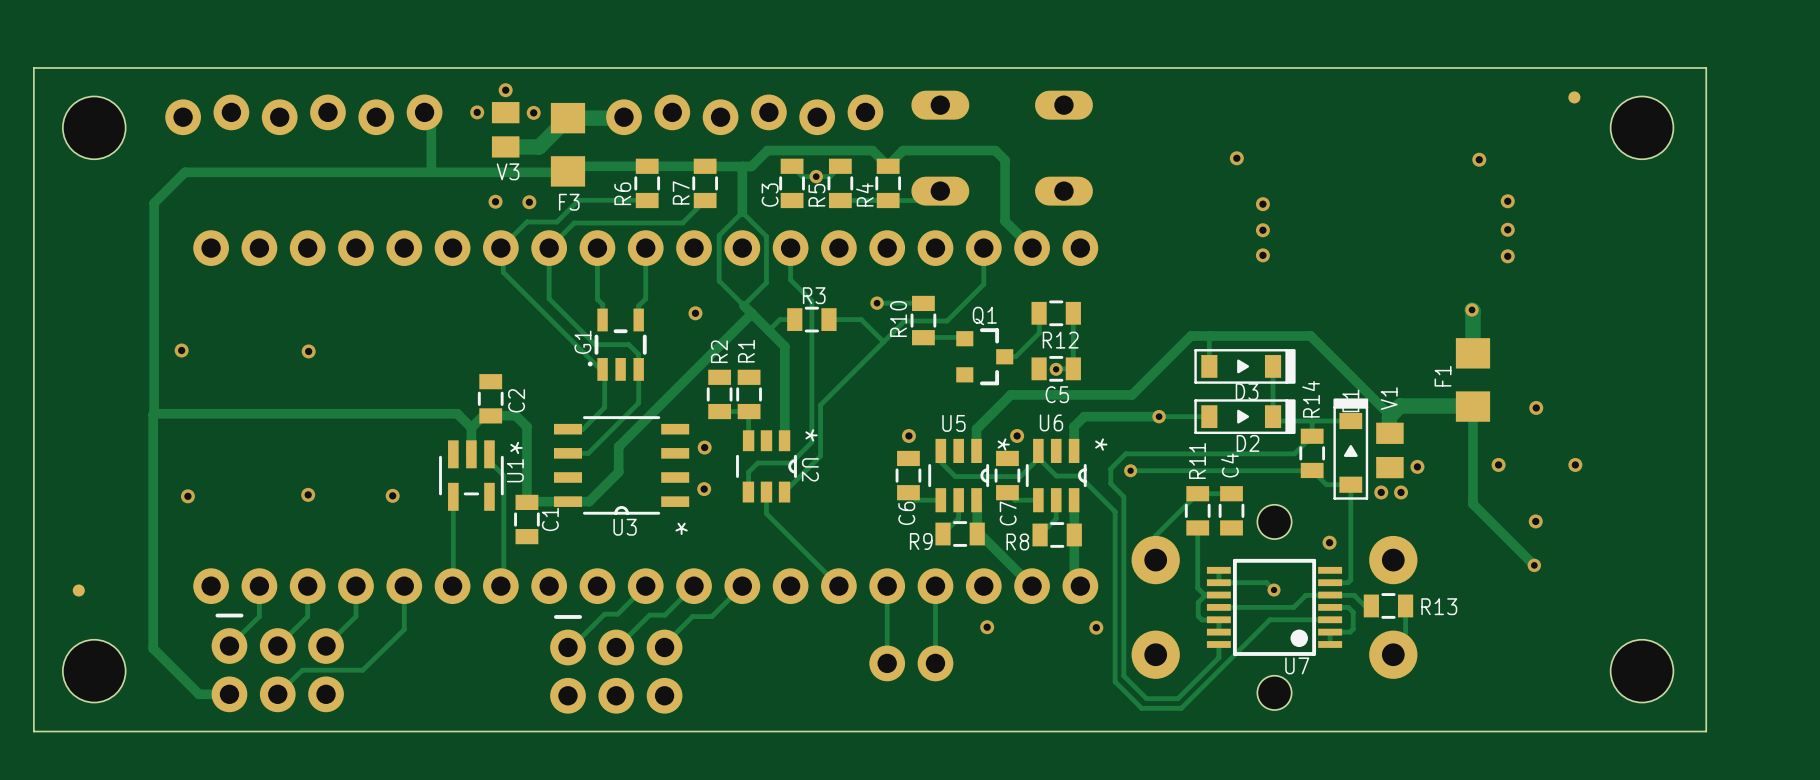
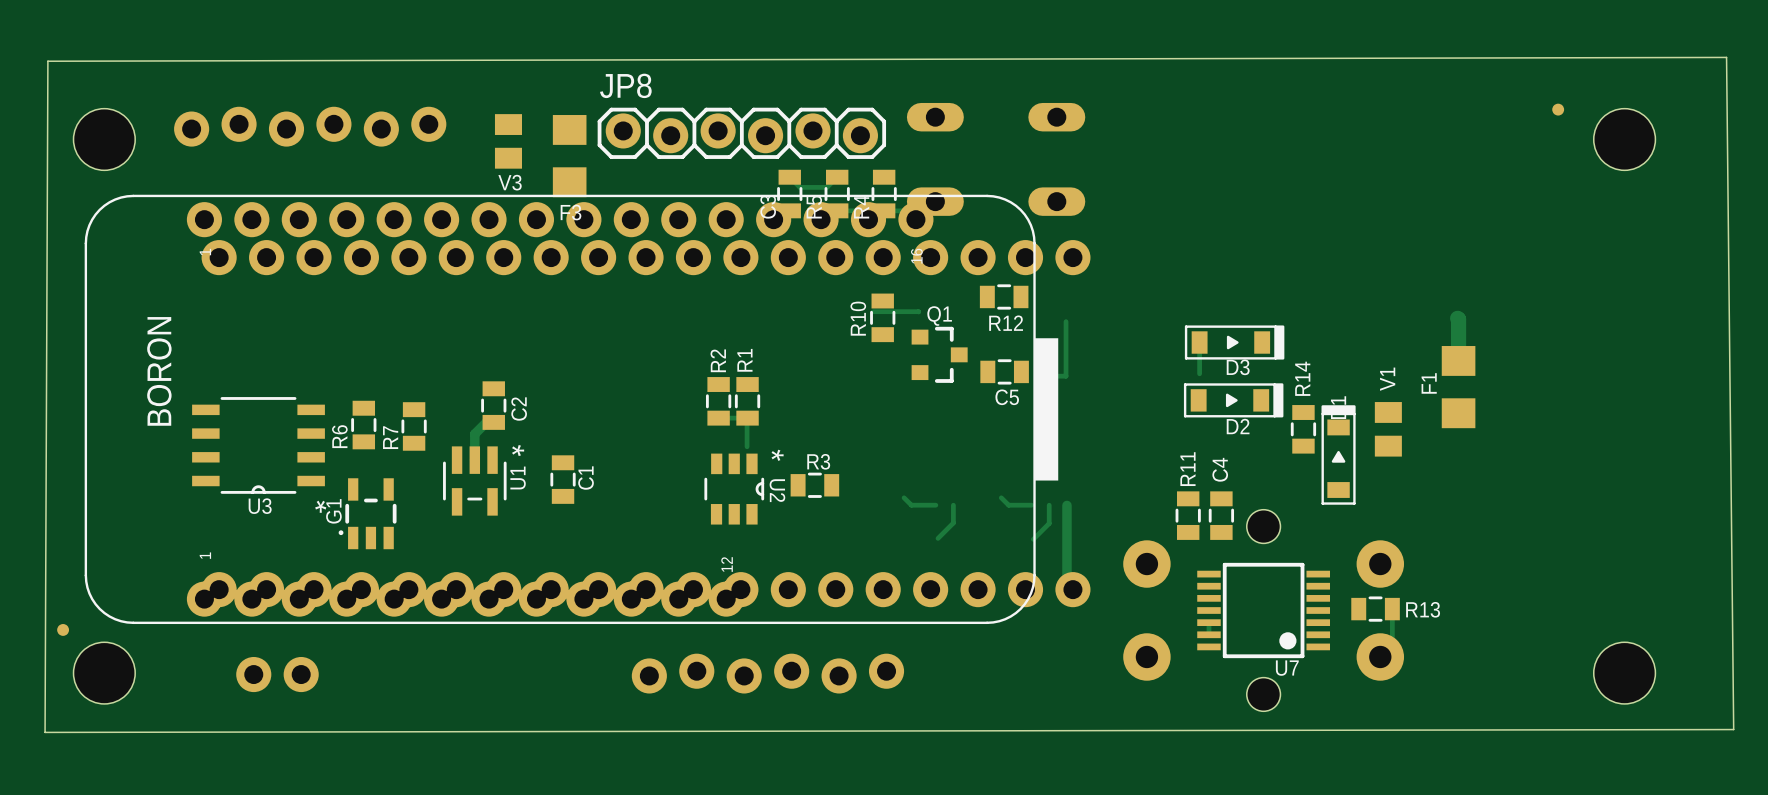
board edge: (33, 67) (1706, 67) (1706, 731) (33, 731) (33, 67) -> (1726, 57) (47, 61) (45, 732) (1733, 729) (1726, 57)
via: (505, 90) -> none
track: (424, 112) (431, 119) (431, 172) -> none
via: (477, 112) -> none
via: (533, 112) -> none
part: (744, 114) -> none
track: (624, 117) (567, 118) (539, 146) (505, 146) -> none
JP8: none -> (741, 133)
via: (1236, 158) -> none
via: (1479, 159) -> none
track: (887, 165) (903, 150) (995, 150) (1005, 160) (1005, 221) (1032, 248) -> none
track: (572, 166) (705, 166) -> none
track: (572, 166) (567, 172) (185, 172) (154, 203) (154, 413) -> none
track: (742, 166) (742, 212) -> none
track: (888, 166) (872, 150) (767, 150) (751, 166) (705, 166) -> none
via: (816, 176) -> none
R6 position: (647, 183) -> (363, 425)
R7 position: (705, 183) -> (414, 426)
track: (646, 200) (578, 200) (556, 222) (527, 222) -> none
track: (705, 200) (682, 223) (574, 223) (549, 248) (549, 298) (595, 344) (628, 344) (638, 354) (638, 402) (588, 453) (567, 453) -> none
via: (495, 201) -> none
via: (1507, 201) -> none
via: (529, 202) -> none
via: (1262, 204) -> none
track: (742, 212) (719, 235) (719, 280) (743, 305) -> none
track: (742, 212) (766, 236) (766, 282) (743, 305) -> none
track: (527, 221) (500, 248) (503, 250) (503, 272) (604, 371) (604, 407) (582, 429) (567, 429) -> none
via: (1507, 229) -> none
via: (1262, 230) -> none
track: (597, 248) (597, 299) (602, 304) (602, 319) -> none
track: (645, 248) (645, 298) (638, 306) (638, 319) -> none
track: (790, 248) (790, 279) (811, 301) (811, 442) (791, 463) (757, 463) (748, 472) (748, 490) -> none
track: (983, 248) (983, 284) (947, 321) (904, 321) (820, 405) (820, 456) (784, 492) -> none
via: (1262, 255) -> none
via: (1507, 256) -> none
via: (877, 303) -> none
track: (743, 305) (784, 346) (784, 440) -> none
via: (1472, 309) -> none
via: (695, 313) -> none
track: (751, 313) (618, 446) (618, 472) (589, 501) (526, 502) (526, 426) (515, 415) (490, 415) -> none
track: (1039, 313) (1039, 333) (1015, 356) (1004, 356) -> none
R12 position: (1056, 313) -> (1004, 296)
track: (794, 319) (779, 319) (768, 330) -> none
R3 position: (811, 319) -> (814, 485)
track: (828, 319) (861, 319) (883, 341) -> none
R10 position: (923, 320) -> (882, 317)
track: (923, 337) (964, 338) -> none
G1 position: (617, 344) -> (367, 513)
via: (181, 350) -> none
via: (308, 351) -> none
Q1 position: (984, 356) -> (939, 354)
D3 position: (1244, 366) -> (1234, 342)
track: (1273, 366) (1273, 416) (1277, 421) (1350, 421) -> none
C5 position: (1056, 368) -> (1004, 371)
via: (1056, 369) -> none
BORON: none -> (571, 409)
via: (1536, 407) -> none
track: (154, 413) (153, 648) (199, 694) (229, 694) -> none
track: (154, 413) (457, 413) (471, 427) -> none
track: (1390, 415) (1310, 336) (1190, 336) (1132, 394) (1010, 394) (976, 429) (976, 450) -> none
via: (1159, 416) -> none
track: (1209, 416) (1084, 416) (1074, 426) (1074, 450) -> none
D2 position: (1244, 416) -> (1233, 400)
track: (1312, 421) (1312, 436) (1294, 453) (1125, 453) (1110, 468) (1110, 483) (1123, 496) (1123, 675) (1146, 698) (1177, 698) (1218, 657) (1218, 644) -> none
track: (1389, 433) (1389, 416) (1400, 406) (1472, 406) (1472, 504) (1534, 565) -> none
via: (908, 435) -> none
via: (1017, 435) -> none
via: (704, 447) -> none
track: (940, 450) (940, 462) (955, 476) (1020, 476) (1038, 458) (1038, 450) -> none
V1 position: (1389, 450) -> (1388, 429)
R14 position: (1312, 453) -> (1303, 429)
track: (489, 454) (489, 461) (503, 475) (503, 583) (500, 586) -> none
track: (1038, 457) (1056, 476) (1079, 476) (1115, 511) (1115, 681) (1141, 708) (1181, 708) (1269, 619) (1330, 619) -> none
via: (1498, 464) -> none
via: (1575, 464) -> none
U3 position: (621, 465) -> (258, 445)
U2 position: (766, 466) -> (734, 489)
via: (1417, 466) -> none
track: (1130, 470) (1312, 470) (1326, 484) (1350, 484) (1350, 579) (1348, 582) (1330, 582) -> none
via: (1130, 470) -> none
C6: (908, 475) -> none
U5: (958, 475) -> none
C7: (1007, 475) -> none
U6: (1056, 475) -> none
via: (704, 489) -> none
track: (766, 492) (766, 513) (838, 586) -> none
via: (1381, 492) -> none
via: (1401, 492) -> none
track: (1231, 493) (1197, 493) (1155, 535) (1155, 560) -> none
via: (308, 494) -> none
via: (392, 495) -> none
via: (187, 496) -> none
track: (453, 496) (452, 586) -> none
track: (976, 500) (977, 534) (979, 534) (1032, 586) -> none
C1 position: (526, 519) -> (563, 479)
via: (1535, 521) -> none
track: (1197, 527) (1197, 588) (1204, 594) (1218, 594) -> none
R9: (960, 534) -> none
R8: (1057, 534) -> none
via: (1329, 542) -> none
via: (1534, 565) -> none
track: (1218, 570) (1218, 582) (1266, 582) (1274, 590) -> none
track: (259, 586) (259, 616) (229, 646) -> none
track: (307, 586) (307, 616) (277, 646) -> none
track: (355, 586) (355, 616) (326, 646) -> none
track: (404, 586) (404, 629) (362, 670) (302, 670) (277, 694) -> none
track: (645, 586) (617, 614) (604, 614) (571, 647) (567, 647) -> none
track: (694, 586) (665, 615) (649, 615) (616, 647) -> none
track: (742, 586) (711, 616) (692, 616) (664, 644) (664, 647) -> none
track: (887, 586) (887, 663) -> none
track: (935, 586) (935, 663) -> none
part position: (78, 590) -> (63, 629)
via: (1274, 590) -> none
track: (1218, 595) (1205, 595) (1198, 602) (1198, 616) (1202, 619) (1218, 619) -> none
track: (1371, 605) (1364, 605) (1354, 595) (1305, 595) (1293, 607) (1218, 607) -> none
track: (1330, 607) (1348, 607) (1353, 612) (1353, 629) (1350, 632) (1330, 632) (1330, 644) -> none
part footprint: [211, 613, 344, 713] -> [236, 656, 319, 693]
via: (987, 627) -> none
via: (1096, 627) -> none
part: (911, 663) -> none
part: (616, 664) -> none
part: none -> (767, 673)

